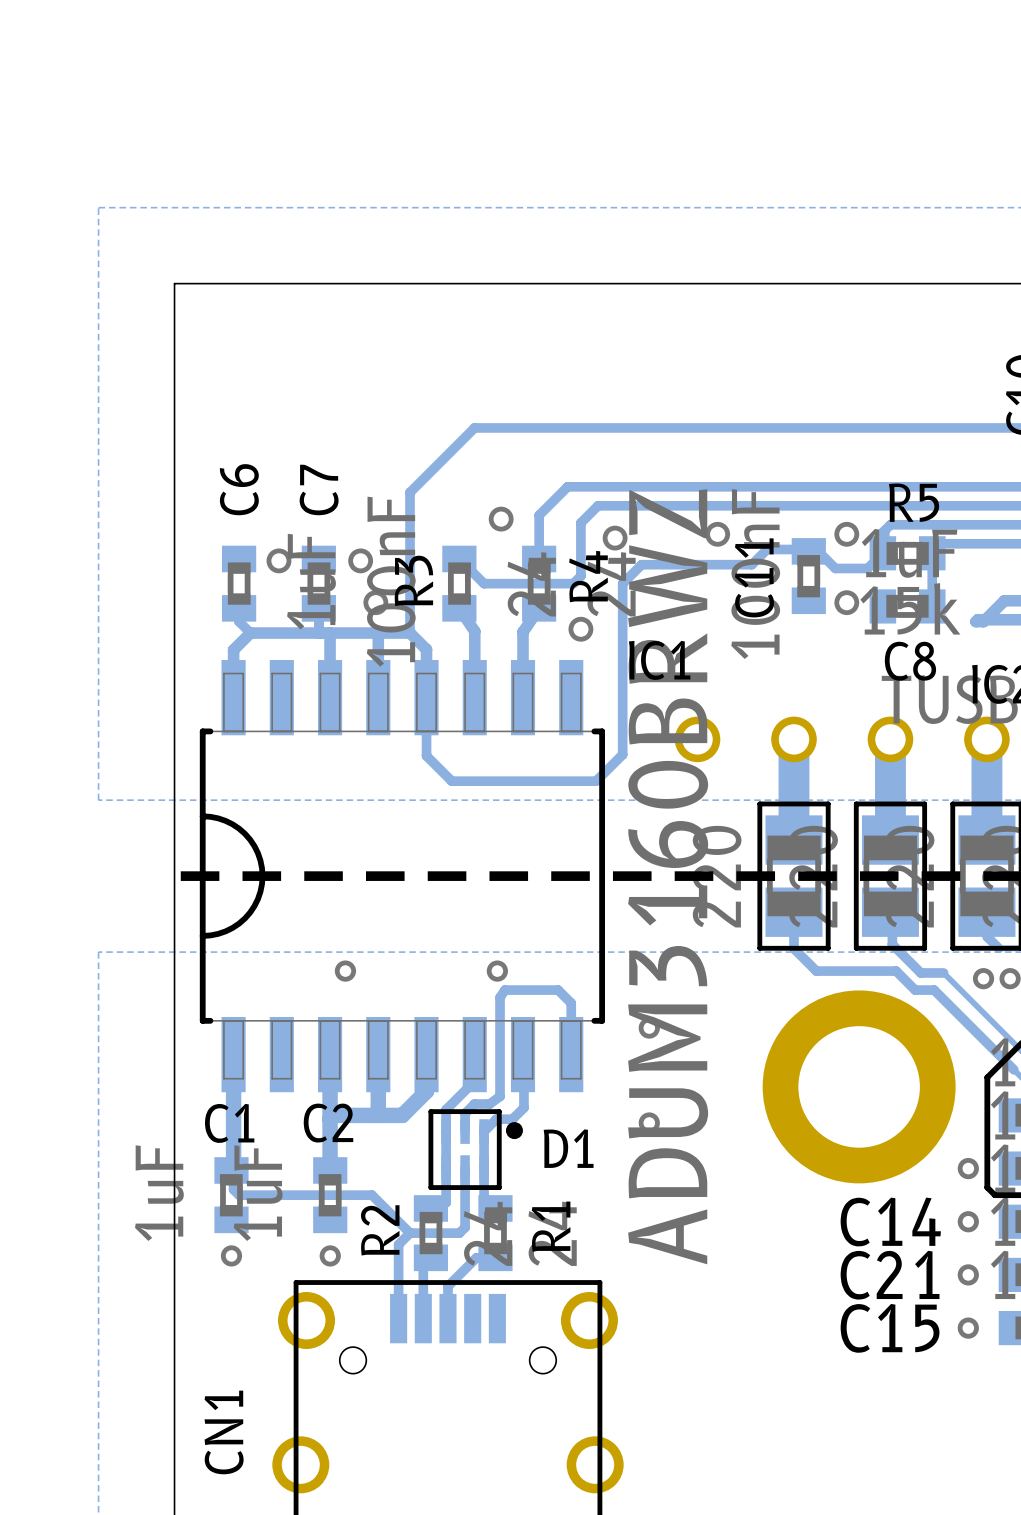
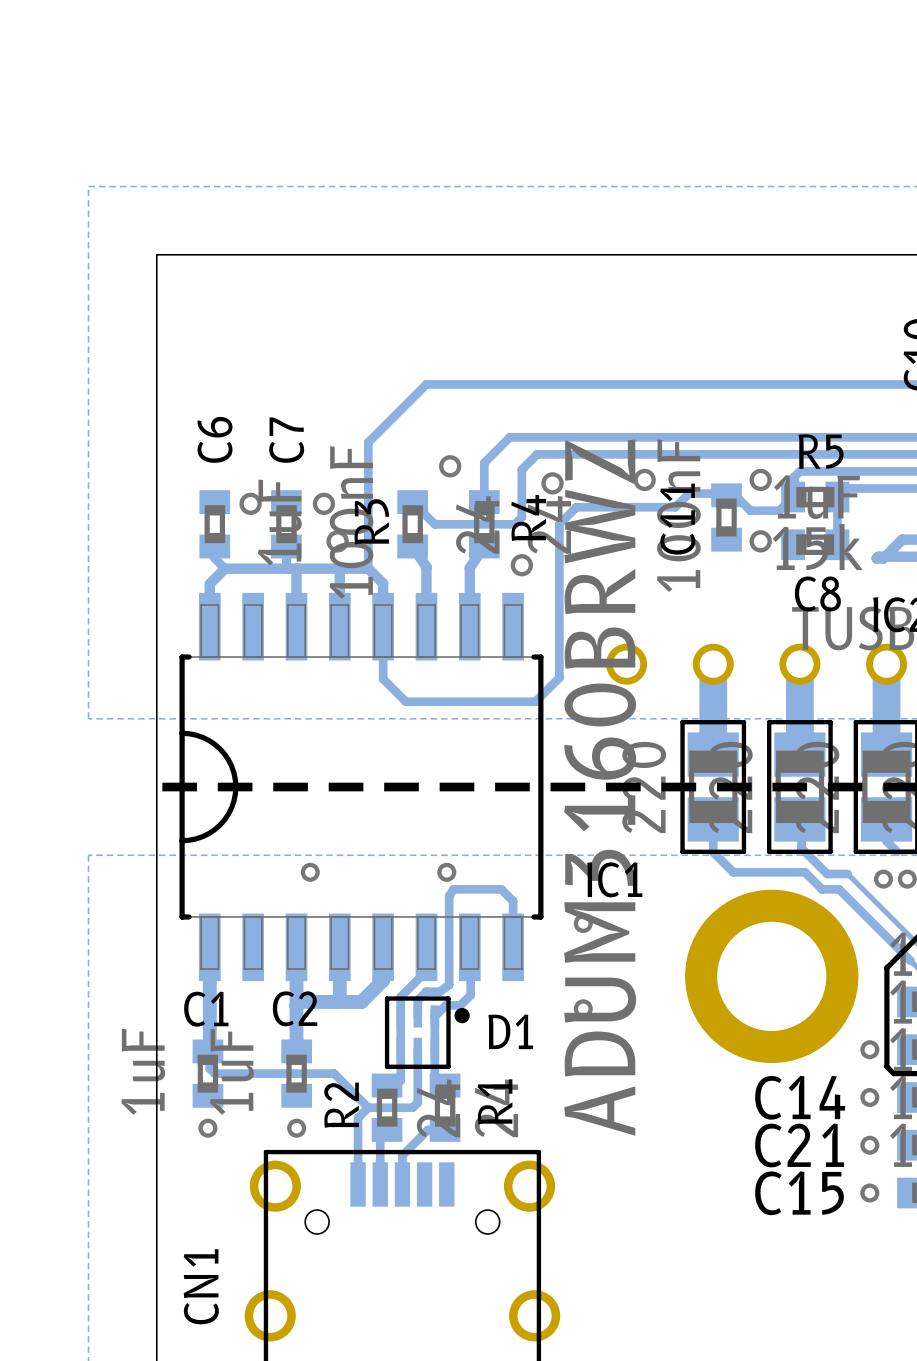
IC1 name position: IC1 (659, 660) -> IC1 (614, 879)

